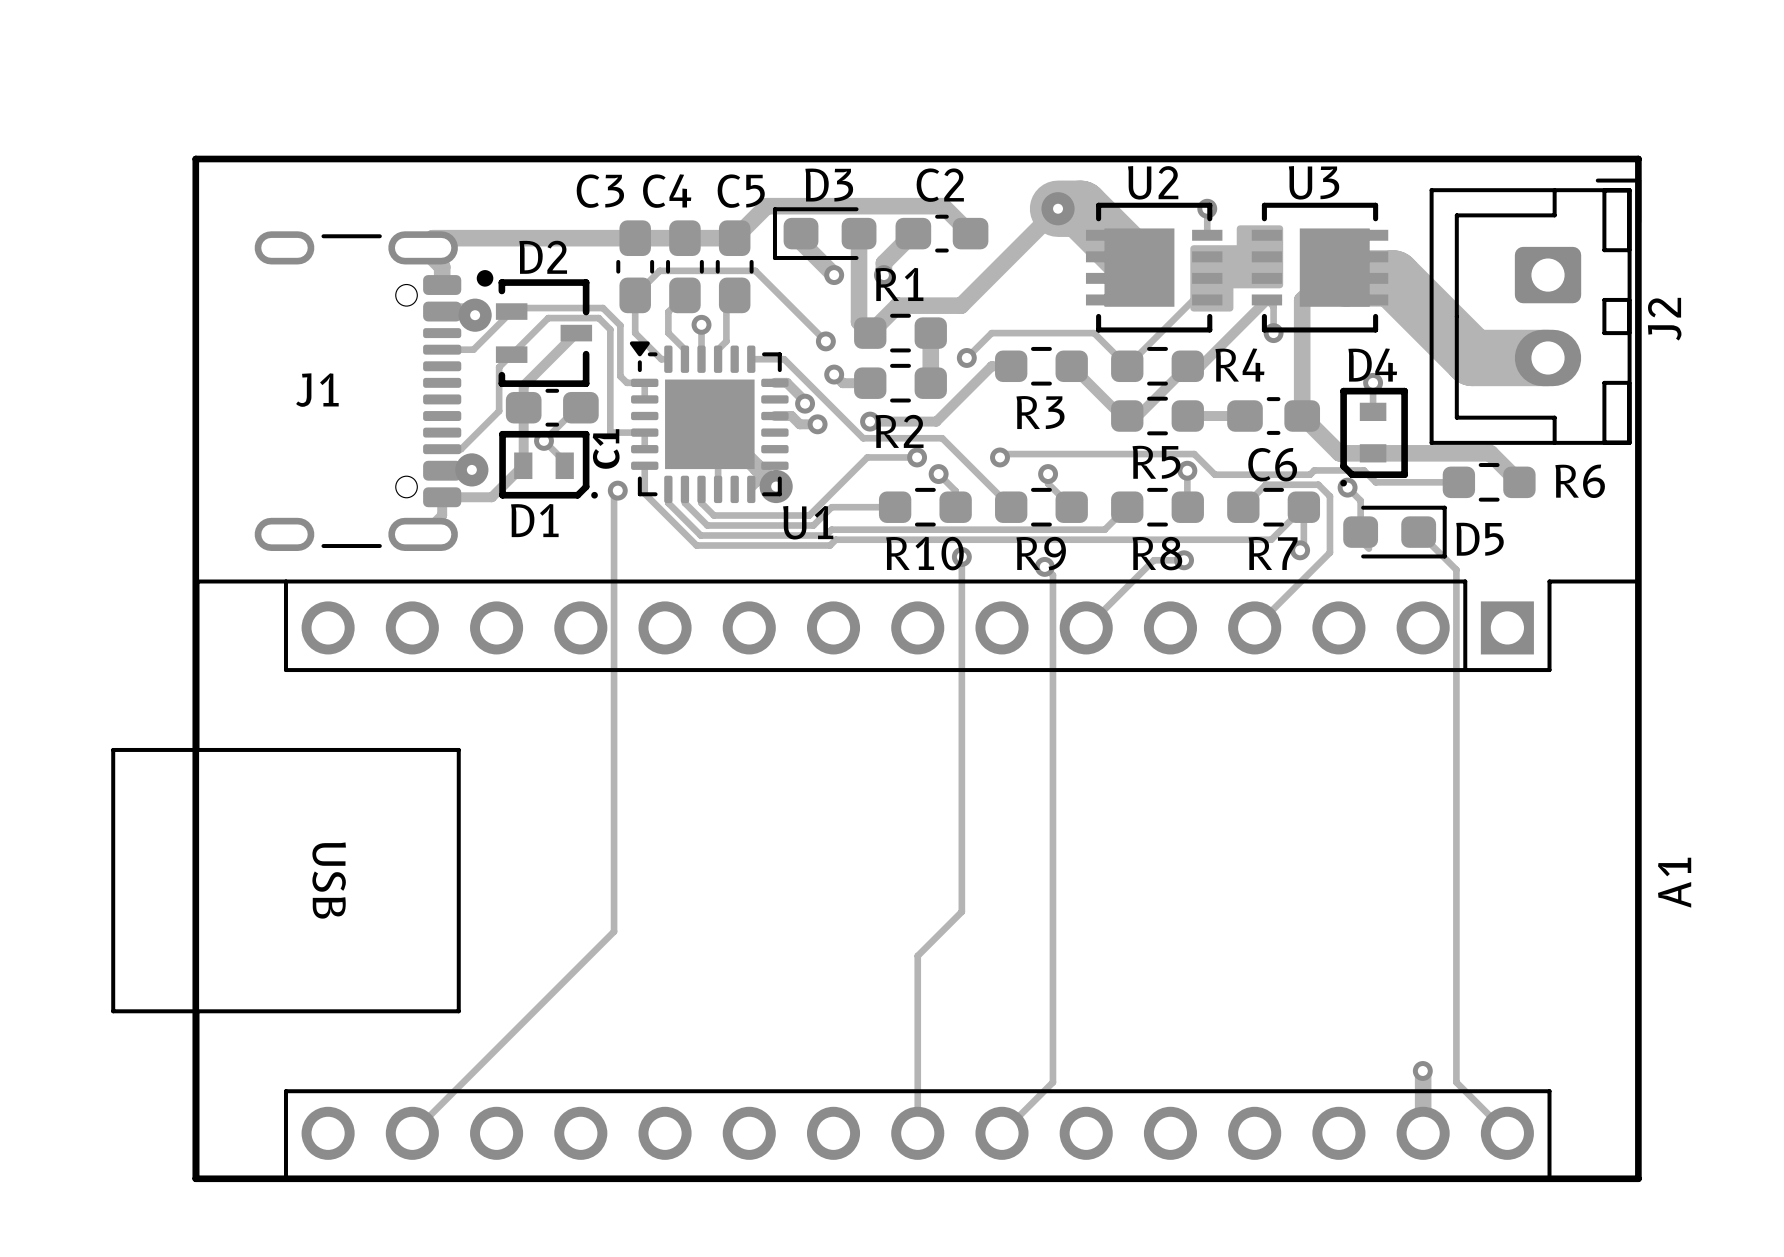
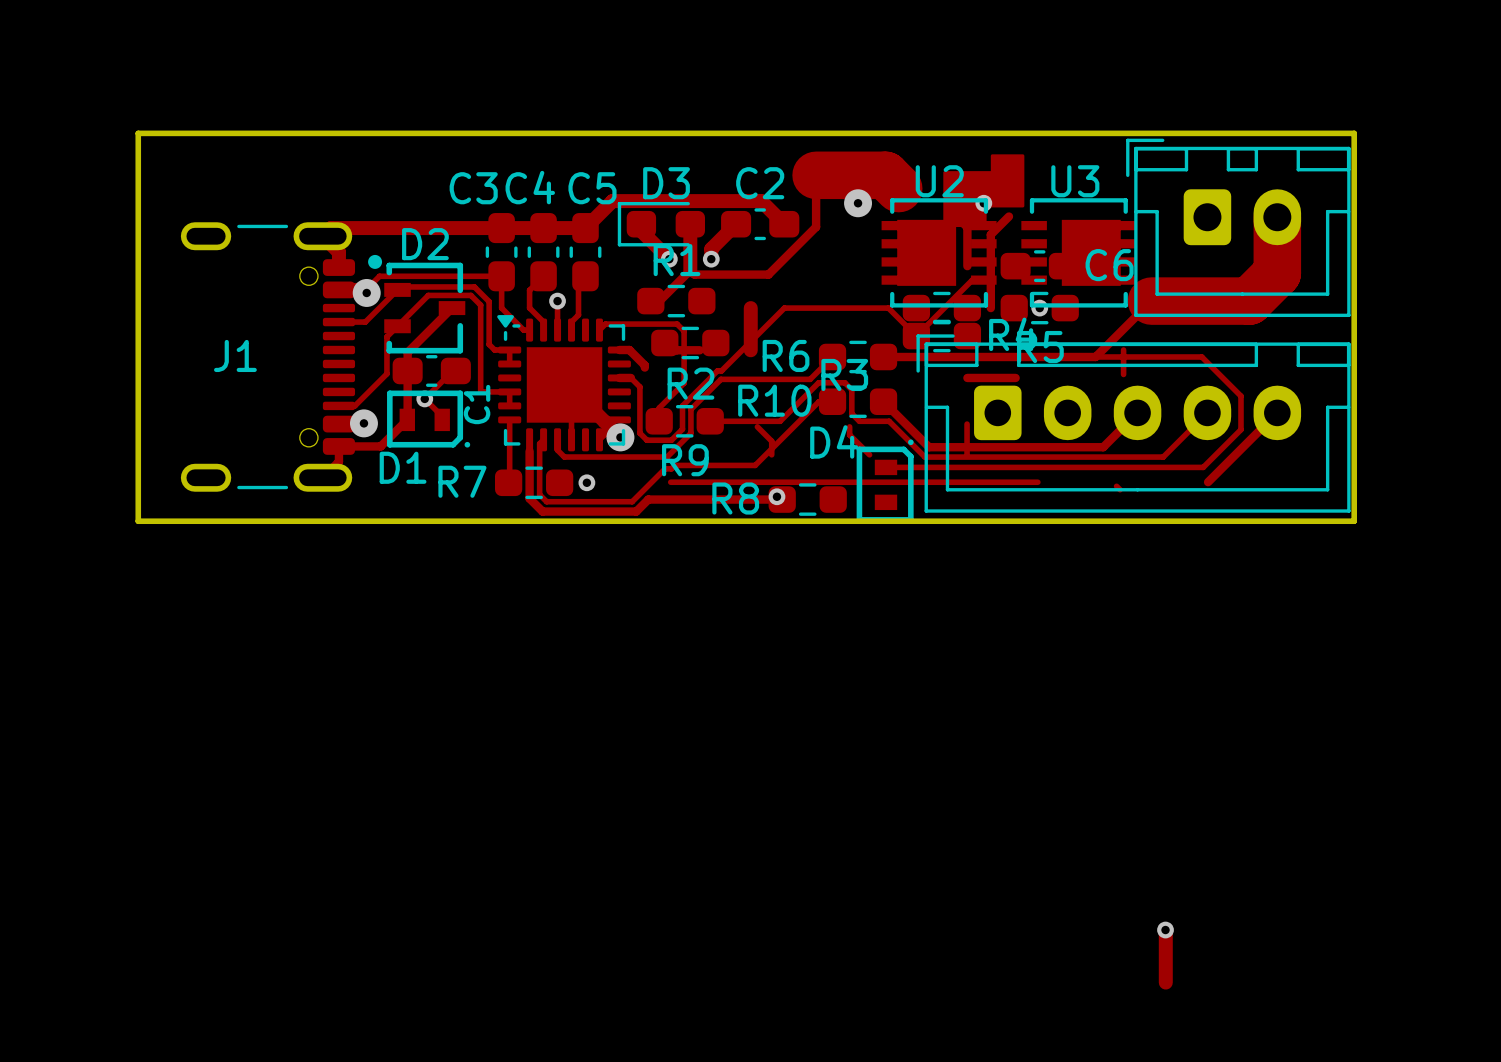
board edge: none -> (138, 133) (1354, 133) (1354, 521) (138, 521) (138, 133)
drawing: none -> [943, 154, 1025, 228]
board edge: (195, 159) (1638, 159) (1638, 1178) (195, 1178) (195, 159) -> none
track: none -> (898, 188) (885, 175) (816, 175) (816, 227) (768, 274) (694, 274) (690, 270) (659, 301) (650, 301)
track: none -> (955, 215) (967, 227) (967, 266)
track: none -> (1008, 216) (990, 234) (990, 308)
drawing: [1190, 225, 1284, 312] -> none
track: none -> (1277, 217) (1277, 273) (1249, 301) (1151, 301) (1095, 356)
part: none -> (1238, 227)
track: (1139, 267) (1080, 208) (1058, 208) (961, 305) (897, 305) (870, 333) (859, 321) (859, 288) -> none
track: (635, 295) (659, 270) (755, 270) (825, 341) -> (501, 276) (379, 276) (366, 289) (366, 292)
track: (1266, 299) (1273, 306) (1273, 333) -> none
track: (1266, 299) (1200, 366) (1187, 366) (1138, 416) (1121, 416) (1071, 366) -> none
J2: (1535, 311) -> none
R1 position: (900, 333) -> (676, 301)
track: (991, 333) (966, 357) -> (802, 308) (784, 308) (721, 370) (717, 370) (682, 405) (682, 429) (671, 440) (646, 440) (639, 433) (639, 386) (630, 377)
via: (825, 341) -> none
via: (966, 357) -> none
track: (1548, 357) (1472, 357) (1393, 278) (1345, 278) (1334, 267) (1302, 300) (1302, 416) (1339, 453) (1490, 453) (1519, 482) -> none
track: (751, 359) (784, 359) (863, 438) (942, 438) (1011, 507) -> (599, 330) (605, 324) (677, 324) (684, 331) (684, 383) (659, 408) (659, 421)
D4 name position: D4 (1372, 365) -> D4 (834, 441)
track: (1011, 366) (991, 366) (936, 421) (870, 421) -> none
R3 position: (1041, 366) -> (941, 308)
via: (834, 374) -> none
via: (1373, 382) -> none
R2 position: (900, 383) -> (690, 343)
track: none -> (883, 356) (1095, 356)
track: none -> (1095, 356) (1201, 356) (1240, 396) (1240, 429) (1203, 467) (885, 467)
via: (805, 403) -> none
track: (788, 416) (791, 416) (799, 424) (817, 424) -> none
R5 position: (1157, 416) -> (1039, 308)
C6 position: (1273, 416) -> (1039, 266)
via: (870, 421) -> none
via: (817, 424) -> none
D4 rotation: 0° (1374, 437) -> 180° (885, 481)
D4 position: (1374, 437) -> (885, 481)
track: none -> (883, 401) (929, 447) (1103, 447) (1137, 412)
track: (914, 454) (917, 457) (867, 457) (809, 515) (713, 515) (701, 501) -> (832, 356) (810, 379) (720, 379) (690, 409) (690, 433) (667, 457) (564, 457) (557, 450)
via: (917, 457) -> none
track: (999, 457) (1003, 454) (1194, 454) (1214, 474) (1310, 474) (1314, 470) (1363, 470) (1375, 482) (1458, 482) -> none
via: (999, 457) -> none
track: none -> (1207, 412) (1163, 457) (924, 457) (889, 421) (859, 421) (851, 413) (851, 389) (844, 382) (818, 382) (780, 421) (710, 421)
track: none -> (1277, 412) (1208, 482)
C6 name position: C6 (1272, 464) -> C6 (1109, 265)
via: (1187, 470) -> none
part: none -> (1133, 423)
via: (938, 474) -> none
via: (1048, 474) -> none
R6 name position: R6 (1580, 481) -> R6 (786, 355)
R6 position: (1489, 482) -> (858, 356)
track: (1347, 487) (1360, 500) (1360, 532) -> none
via: (1347, 487) -> none
track: (684, 489) (684, 503) (707, 525) (813, 525) (831, 507) (895, 507) -> (543, 439) (539, 443) (539, 494) (546, 501) (632, 501) (665, 468) (671, 468) (674, 465) (755, 465) (818, 401) (832, 401)
track: (617, 490) (614, 494) (614, 931) (412, 1133) -> none
via: (617, 490) -> none
track: (644, 493) (696, 545) (830, 545) (835, 539) -> (509, 443) (509, 486) (507, 488)
track: (668, 503) (700, 535) (825, 535) (831, 529) (1104, 529) (1127, 507) -> (529, 451) (529, 498) (542, 511) (636, 511) (648, 499) (782, 499)
R10 position: (925, 507) -> (858, 401)
R9 position: (1041, 507) -> (684, 421)
R8 position: (1157, 507) -> (807, 499)
track: (1243, 507) (1265, 484) (1318, 484) (1329, 496) (1329, 552) (1254, 627) -> none
R7 position: (1273, 507) -> (534, 482)
D1 name position: D1 (534, 520) -> D1 (403, 467)
U1 name: U1 (808, 522) -> none
D5: (1394, 532) -> none
track: (1418, 532) (1456, 569) (1456, 1082) (1507, 1133) -> none
track: (1271, 539) (1303, 507) (1303, 546) (1300, 550) -> none
via: none -> (586, 482)
via: (1300, 550) -> none
R10 name position: R10 (924, 553) -> R10 (774, 400)
R8 name position: R8 (1157, 553) -> R8 (735, 498)
R7 name position: R7 (1273, 553) -> R7 (462, 481)
track: (961, 556) (961, 911) (917, 955) (917, 1133) -> none
track: (1184, 560) (1153, 560) (1086, 627) -> none
via: (1184, 560) -> none
track: (1044, 566) (1052, 575) (1052, 1082) (1001, 1133) -> none
via: (1044, 566) -> none
A1: (875, 880) -> none

